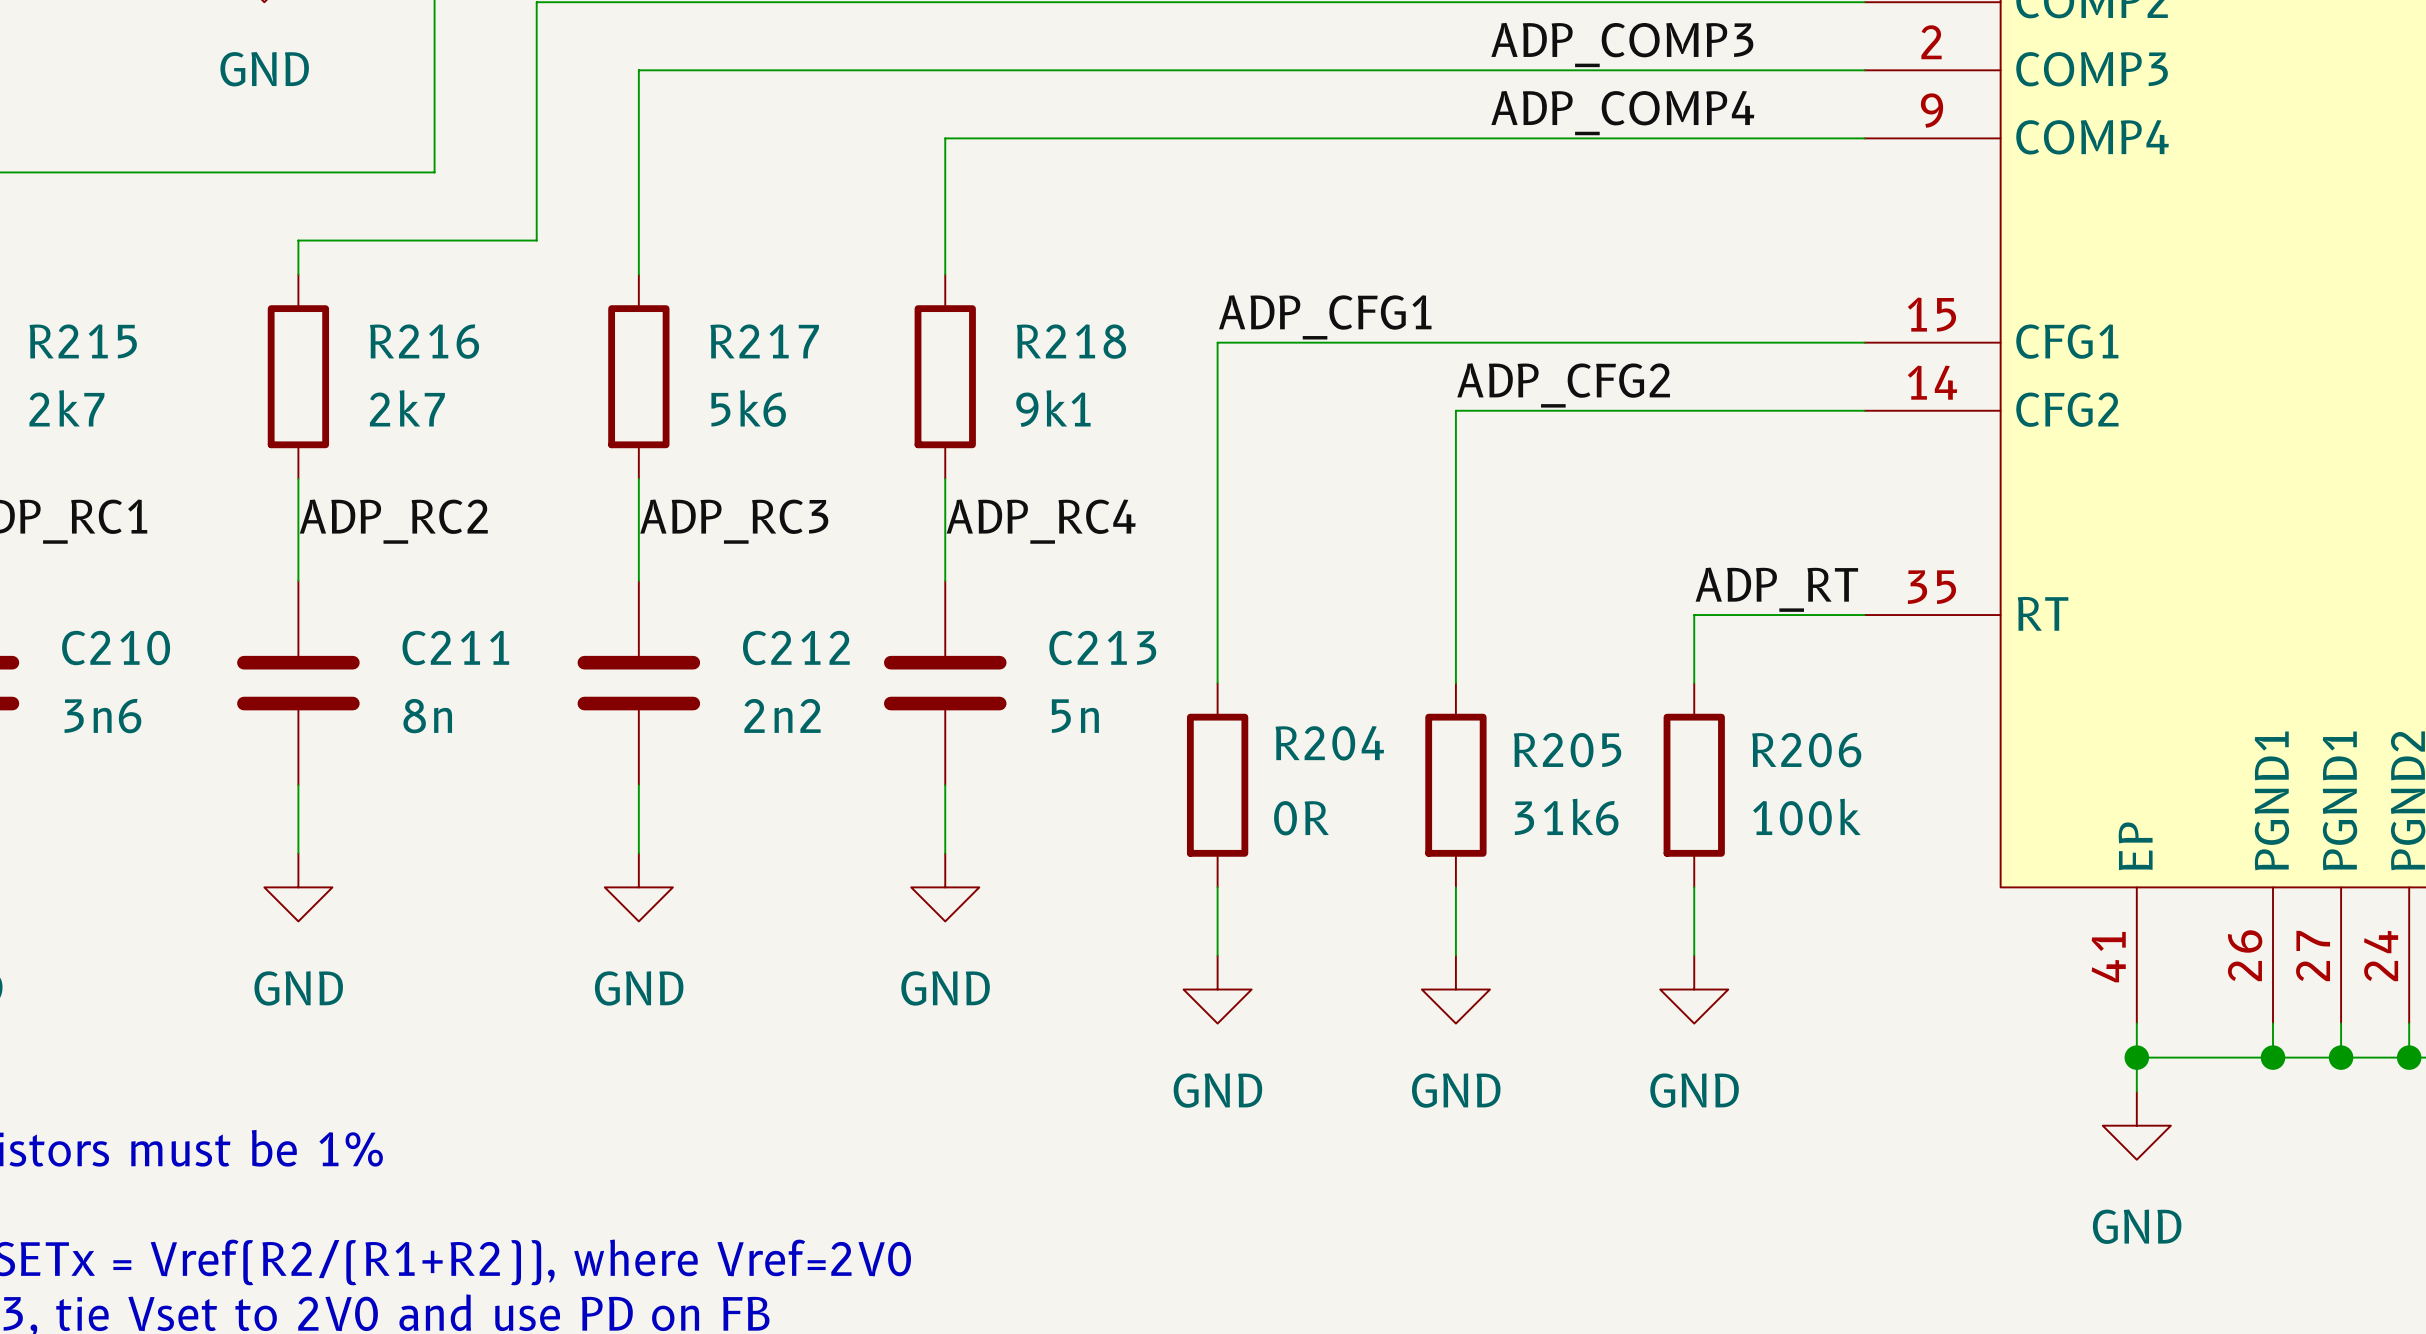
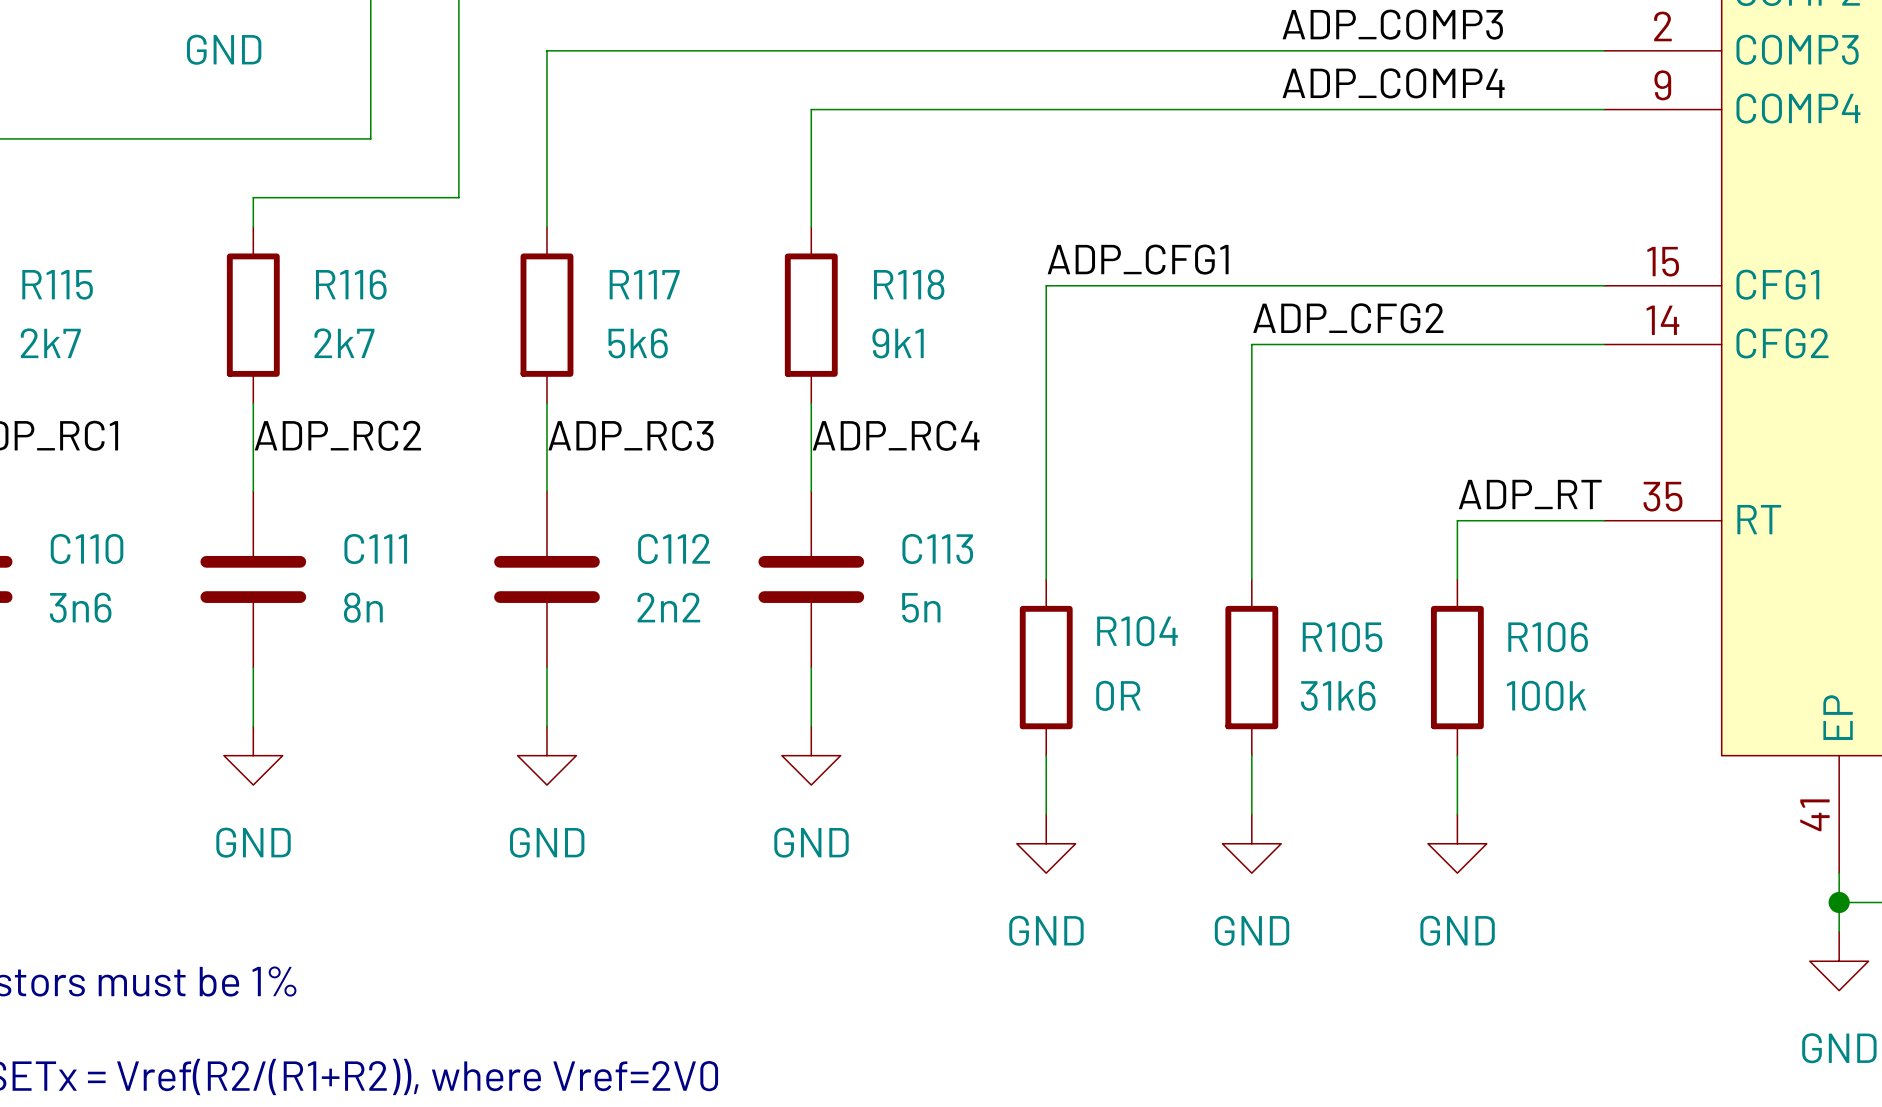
R215 name: R215 (83, 341) -> R115 (57, 284)
R216 name: R216 (424, 341) -> R116 (351, 284)
R217 name: R217 (764, 341) -> R117 (644, 284)
R218 name: R218 (1071, 341) -> R118 (909, 284)
C210 name: C210 (116, 647) -> C110 (87, 549)
C211 name: C211 (455, 647) -> C111 (375, 549)
C212 name: C212 (796, 647) -> C112 (674, 549)
C213 name: C213 (1102, 647) -> C113 (937, 549)
R204 name: R204 (1329, 743) -> R104 (1137, 631)
R205 name: R205 (1567, 750) -> R105 (1342, 637)
R206 name: R206 (1806, 750) -> R106 (1548, 637)

